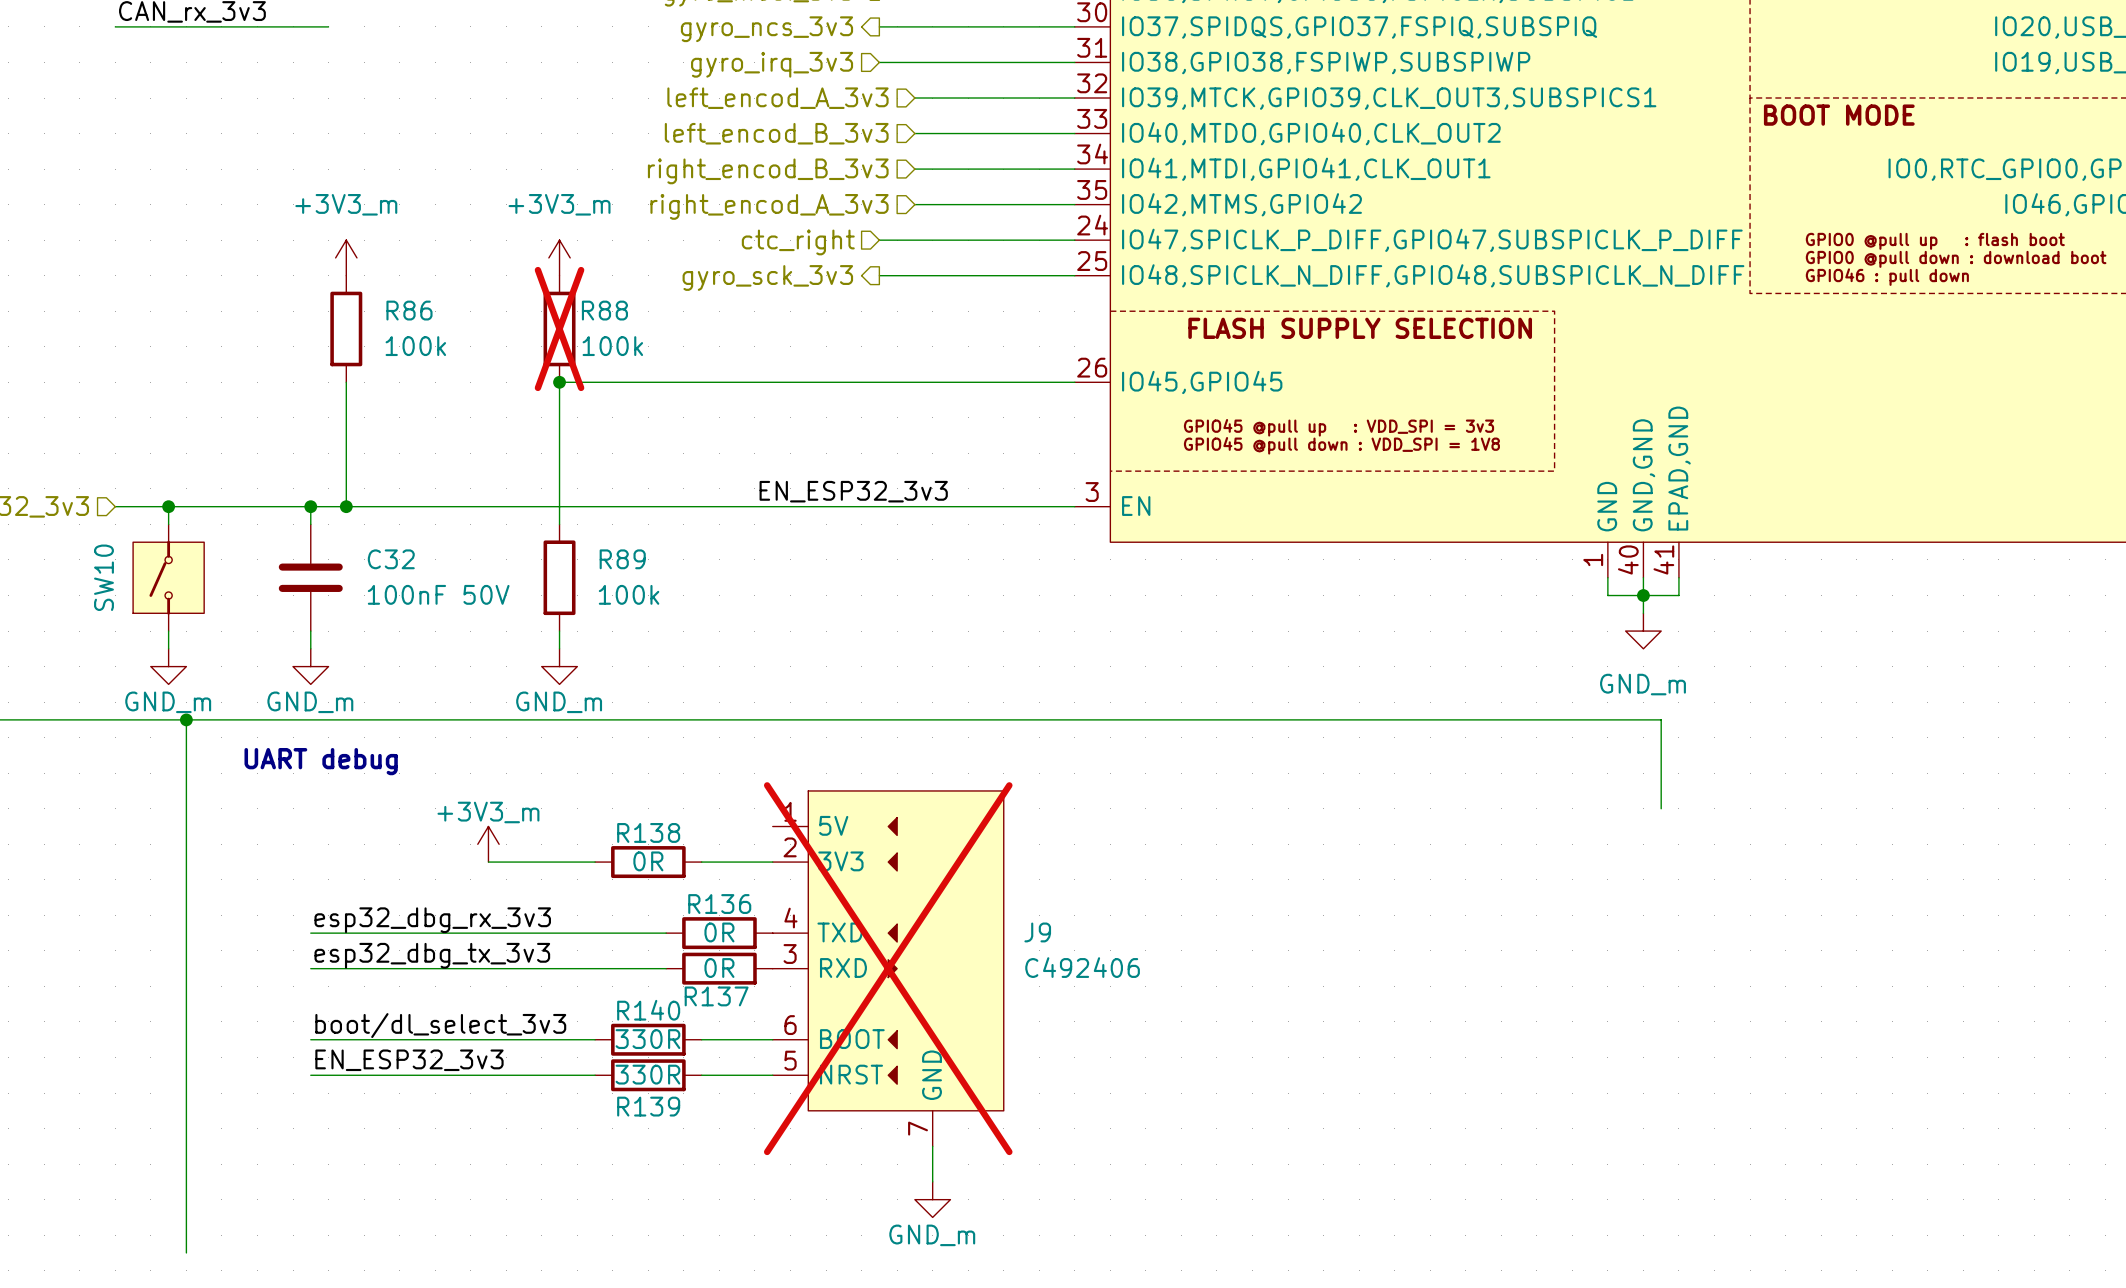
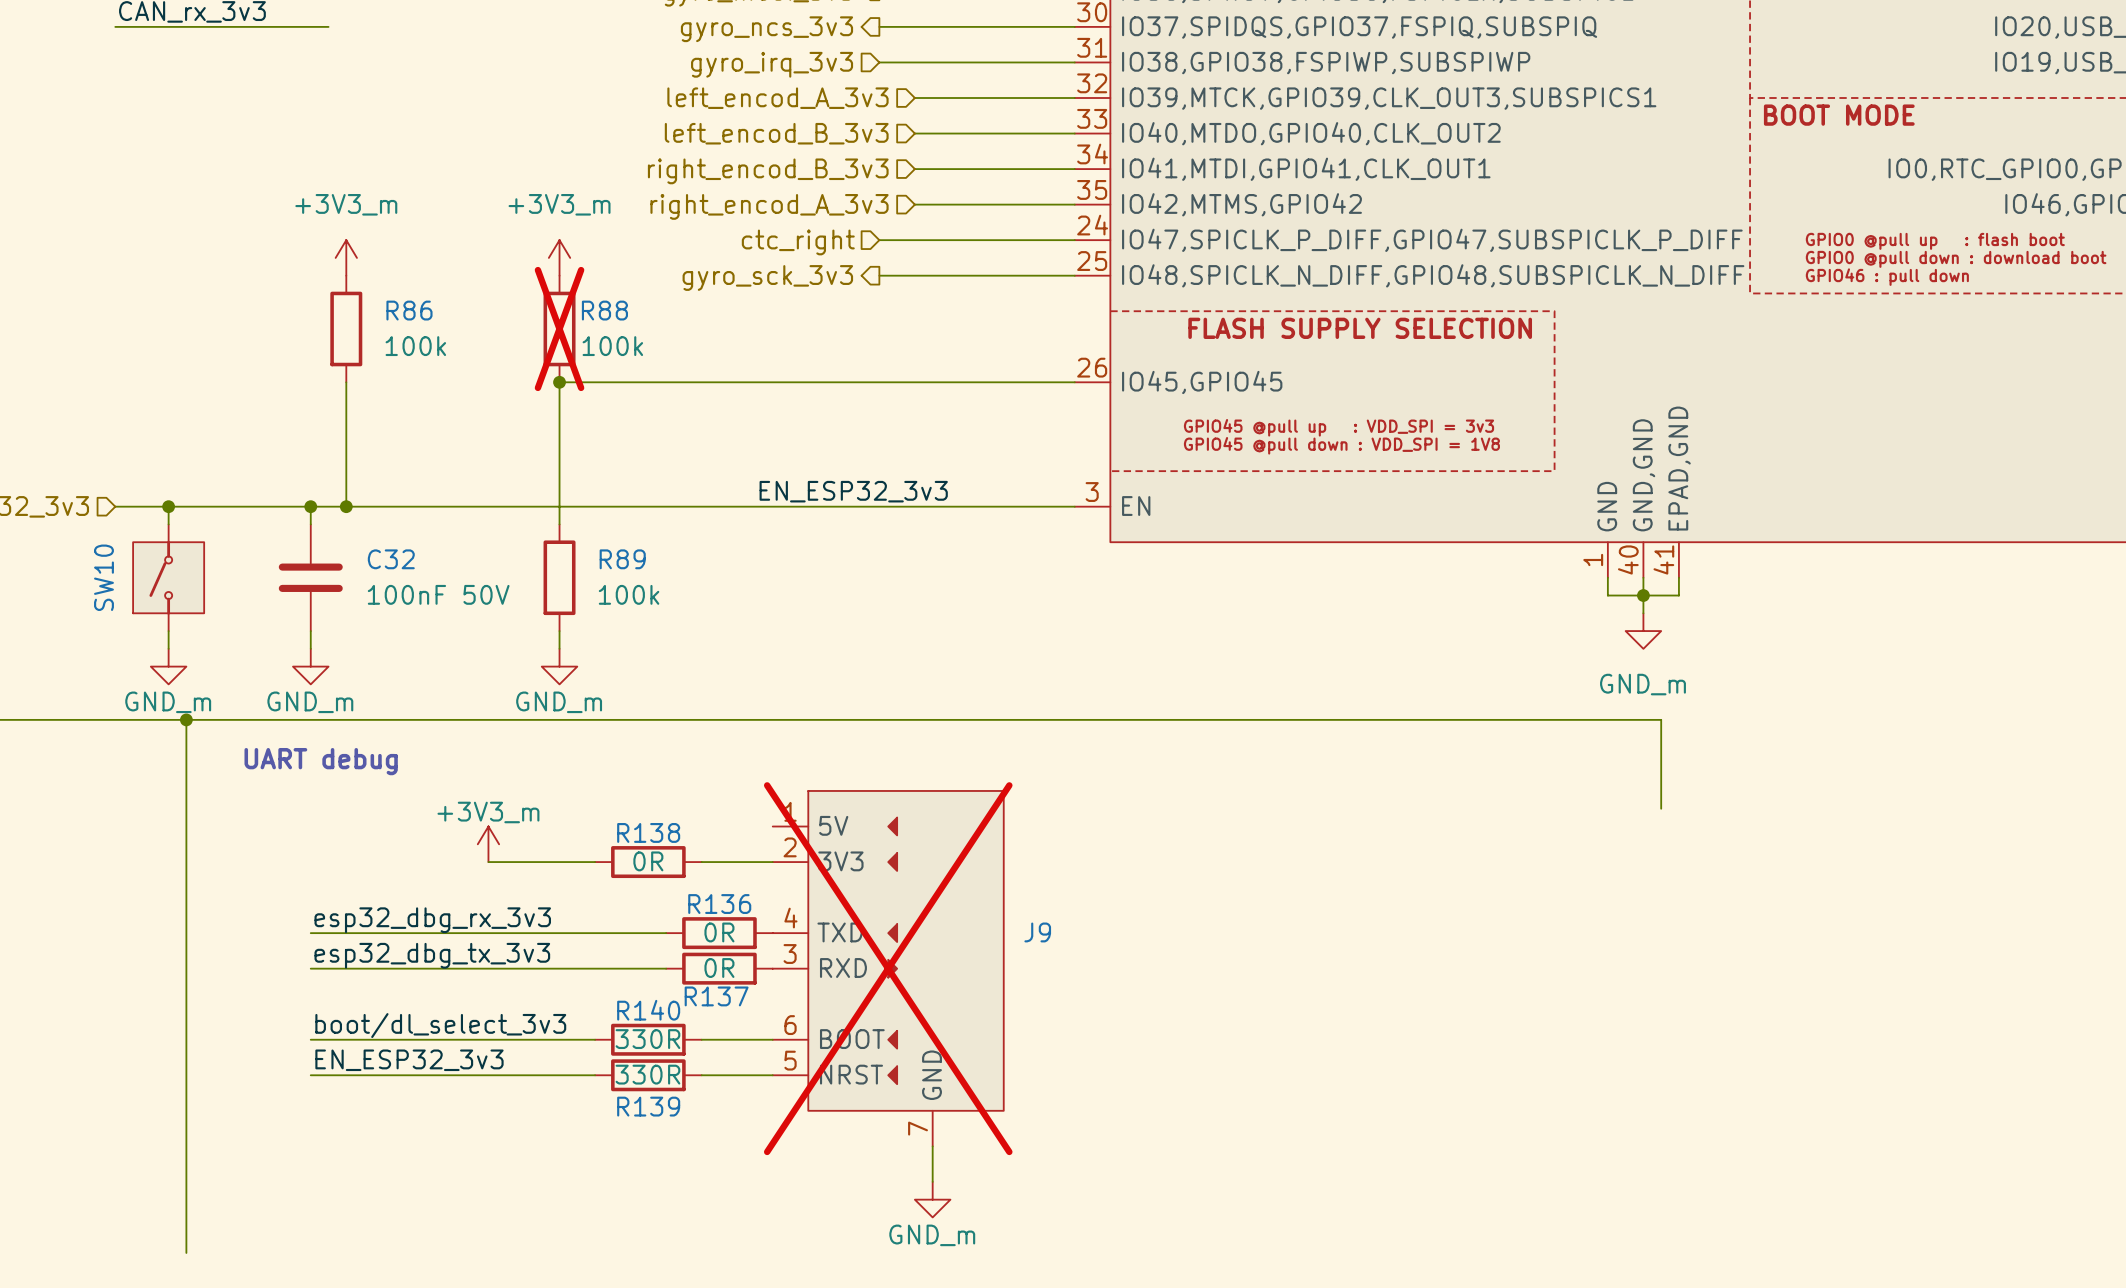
J9 text: C492406 (1082, 967) -> none

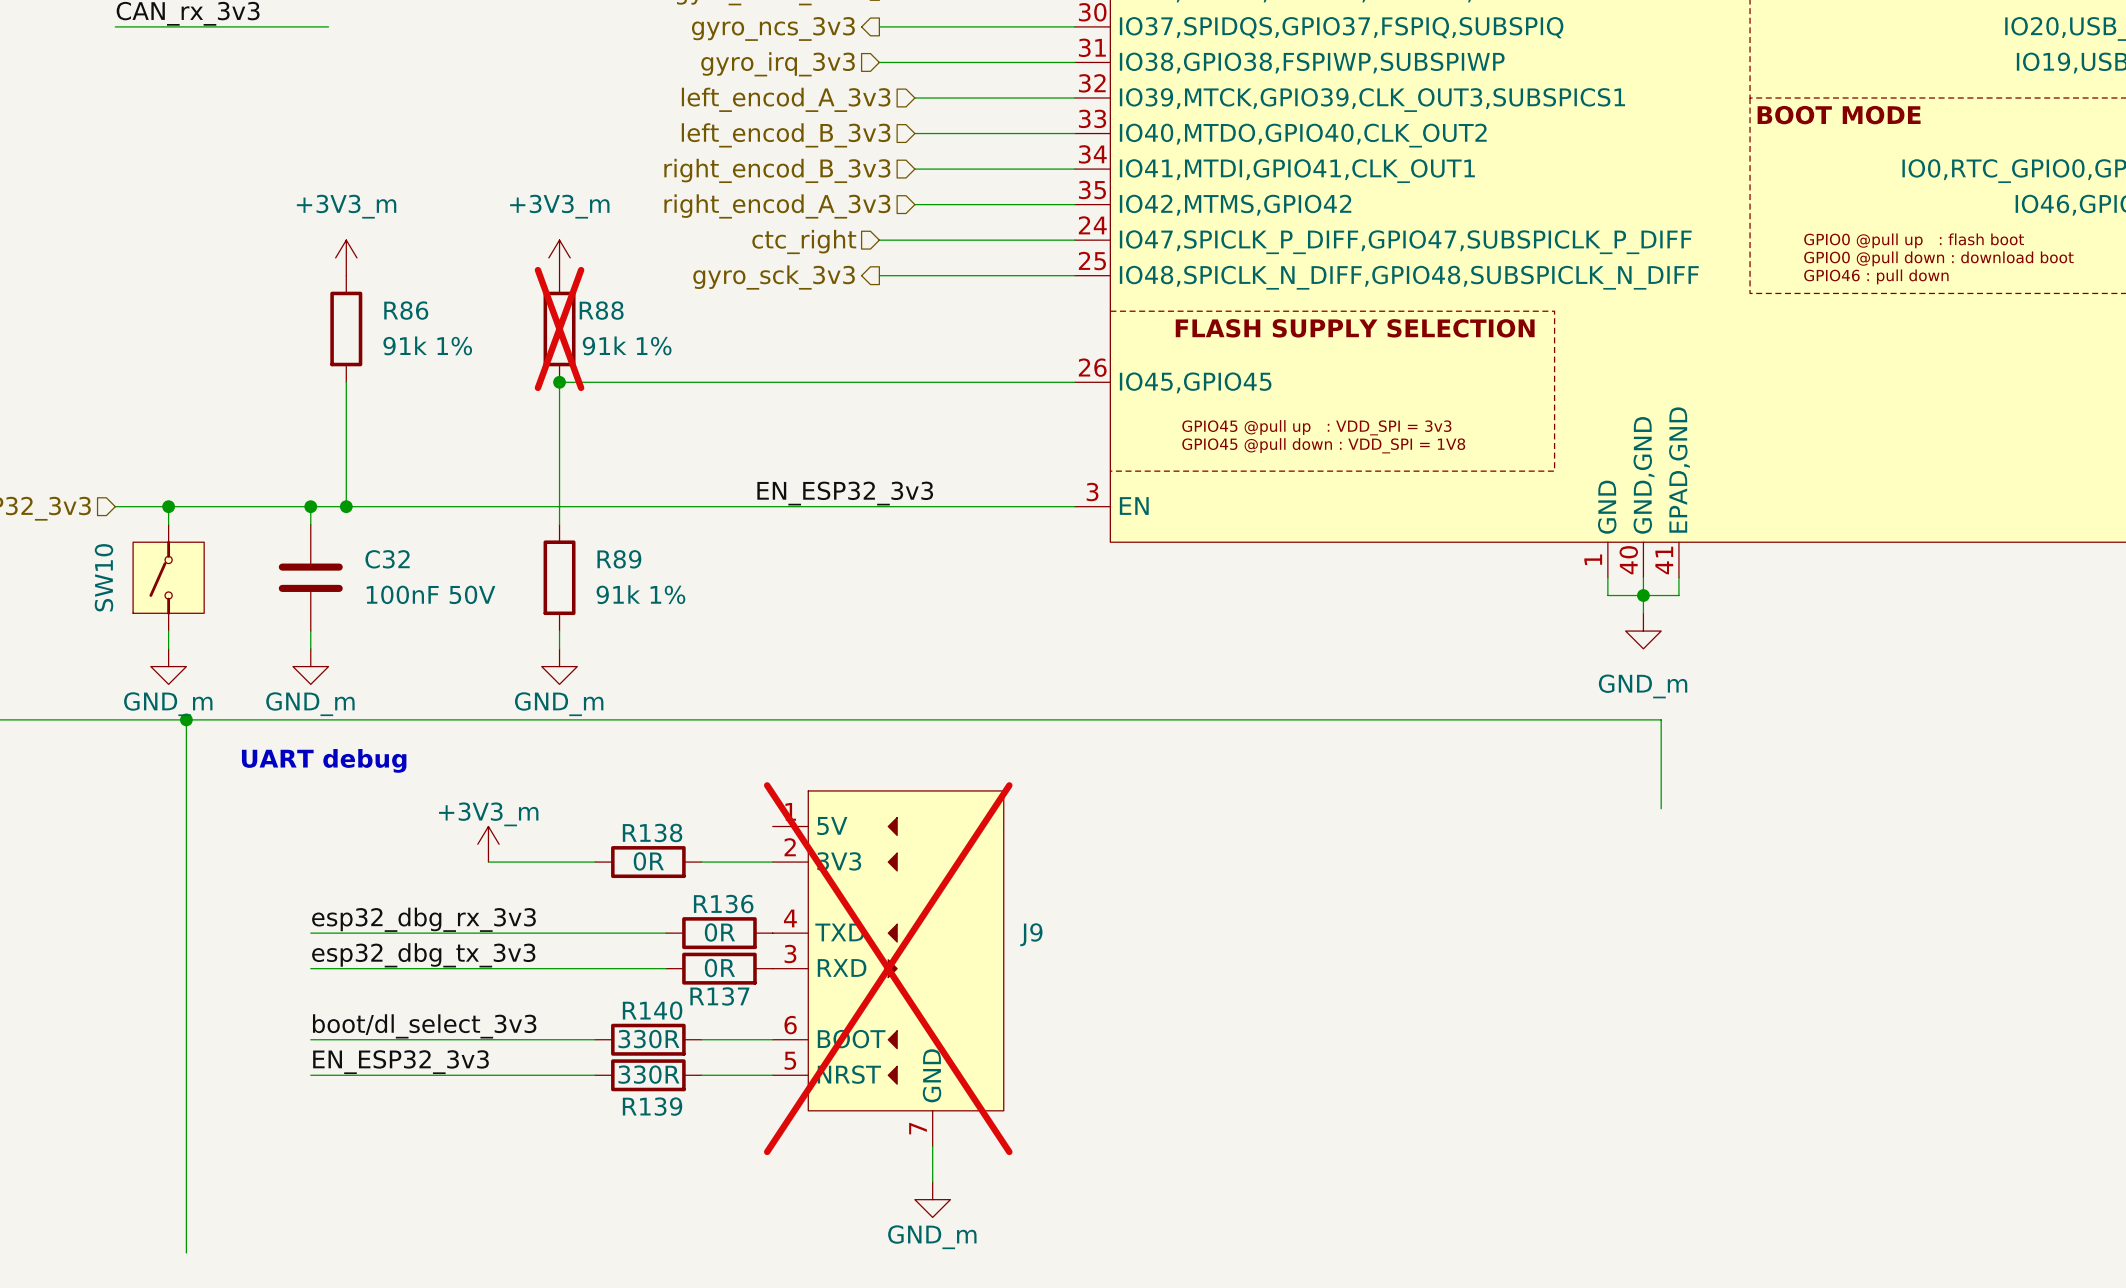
R86 value: 100k (415, 346) -> 91k 1% (427, 345)
R88 value: 100k (612, 346) -> 91k 1% (627, 345)
R89 value: 100k (629, 594) -> 91k 1% (640, 594)

